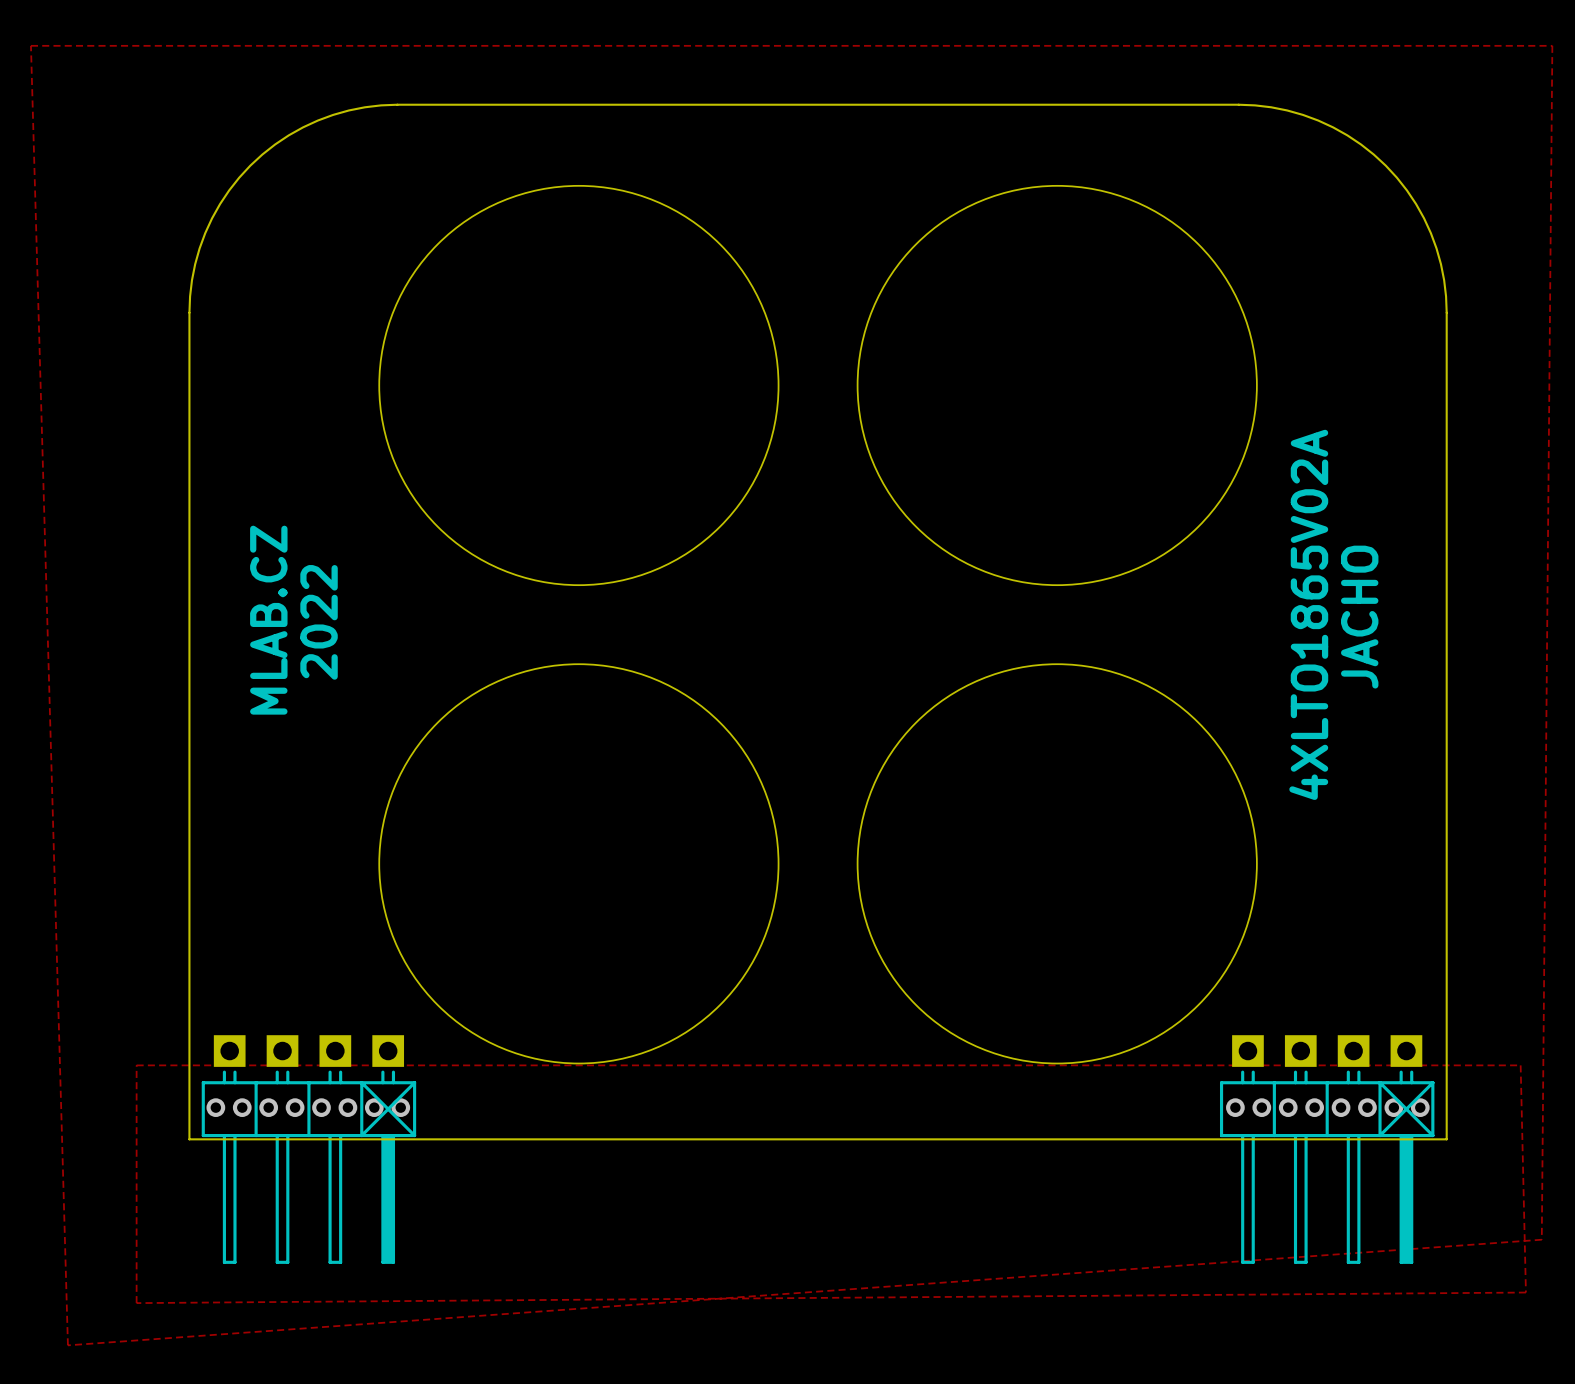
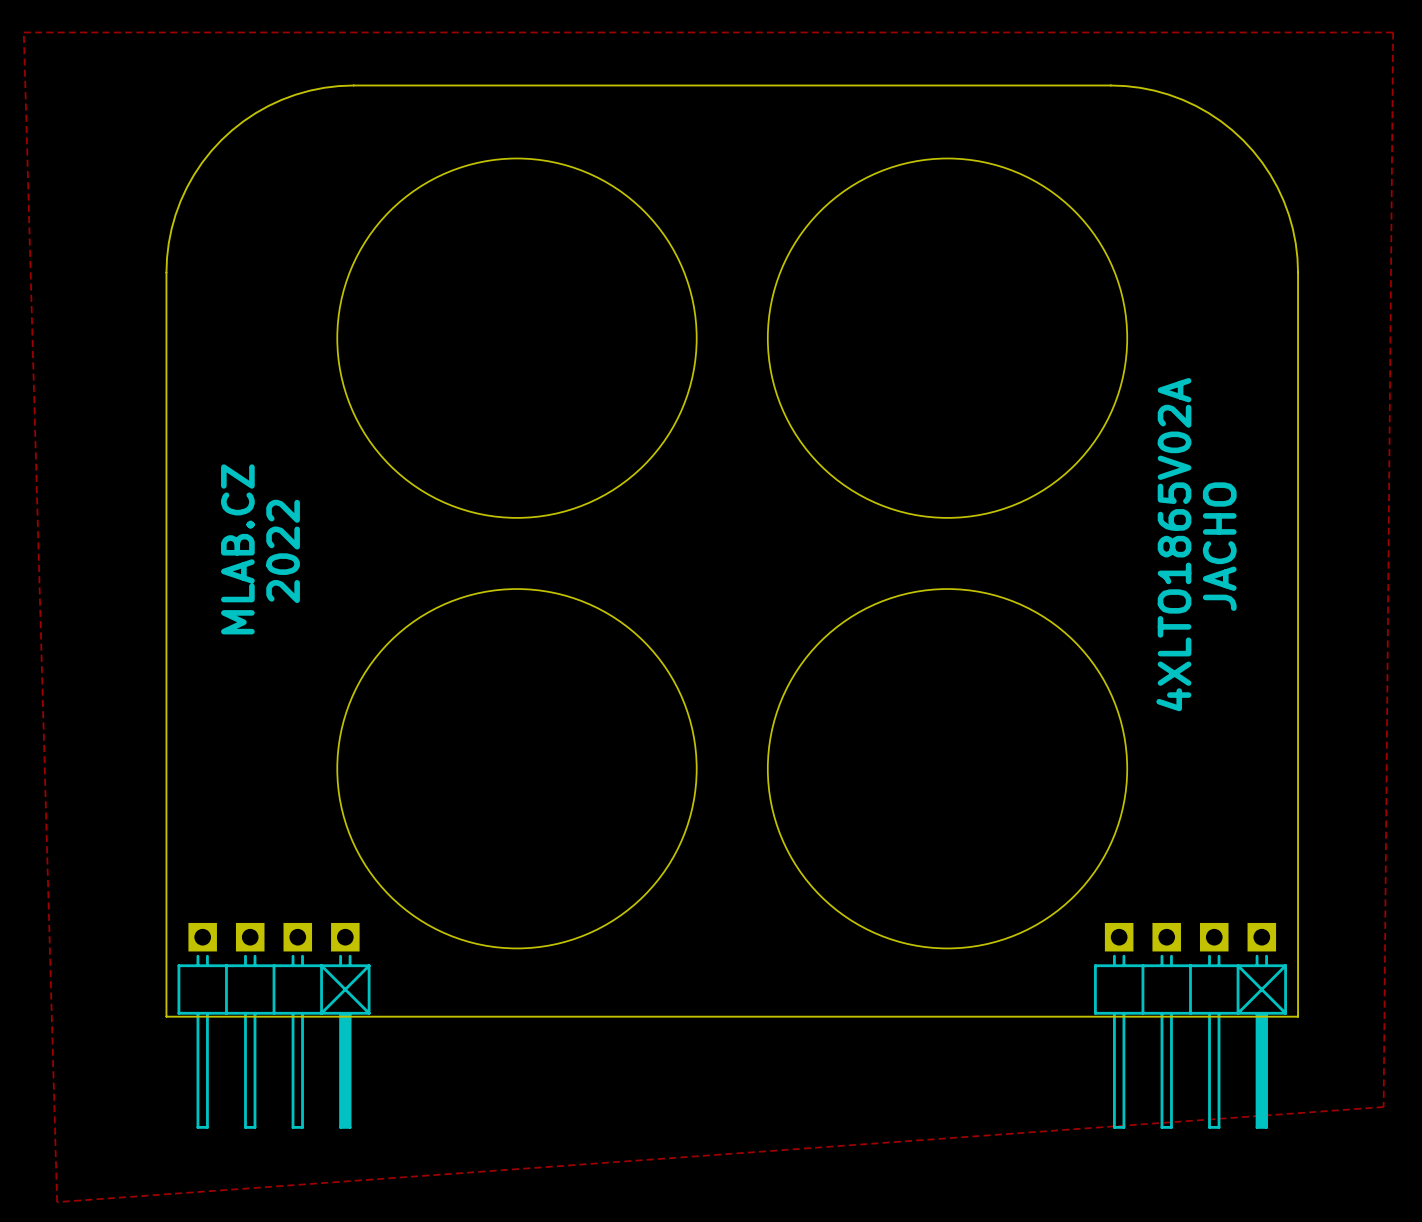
zone outline: (136, 1065) (136, 1303) (1525, 1292) (1520, 1065) (136, 1065) -> none
via: (215, 1107) -> none
via: (242, 1107) -> none
via: (268, 1107) -> none
via: (295, 1107) -> none
via: (321, 1107) -> none
via: (347, 1107) -> none
via: (374, 1107) -> none
via: (400, 1107) -> none
via: (1235, 1107) -> none
via: (1261, 1107) -> none
via: (1288, 1107) -> none
via: (1314, 1107) -> none
via: (1341, 1107) -> none
via: (1367, 1107) -> none
via: (1393, 1107) -> none
via: (1420, 1107) -> none

